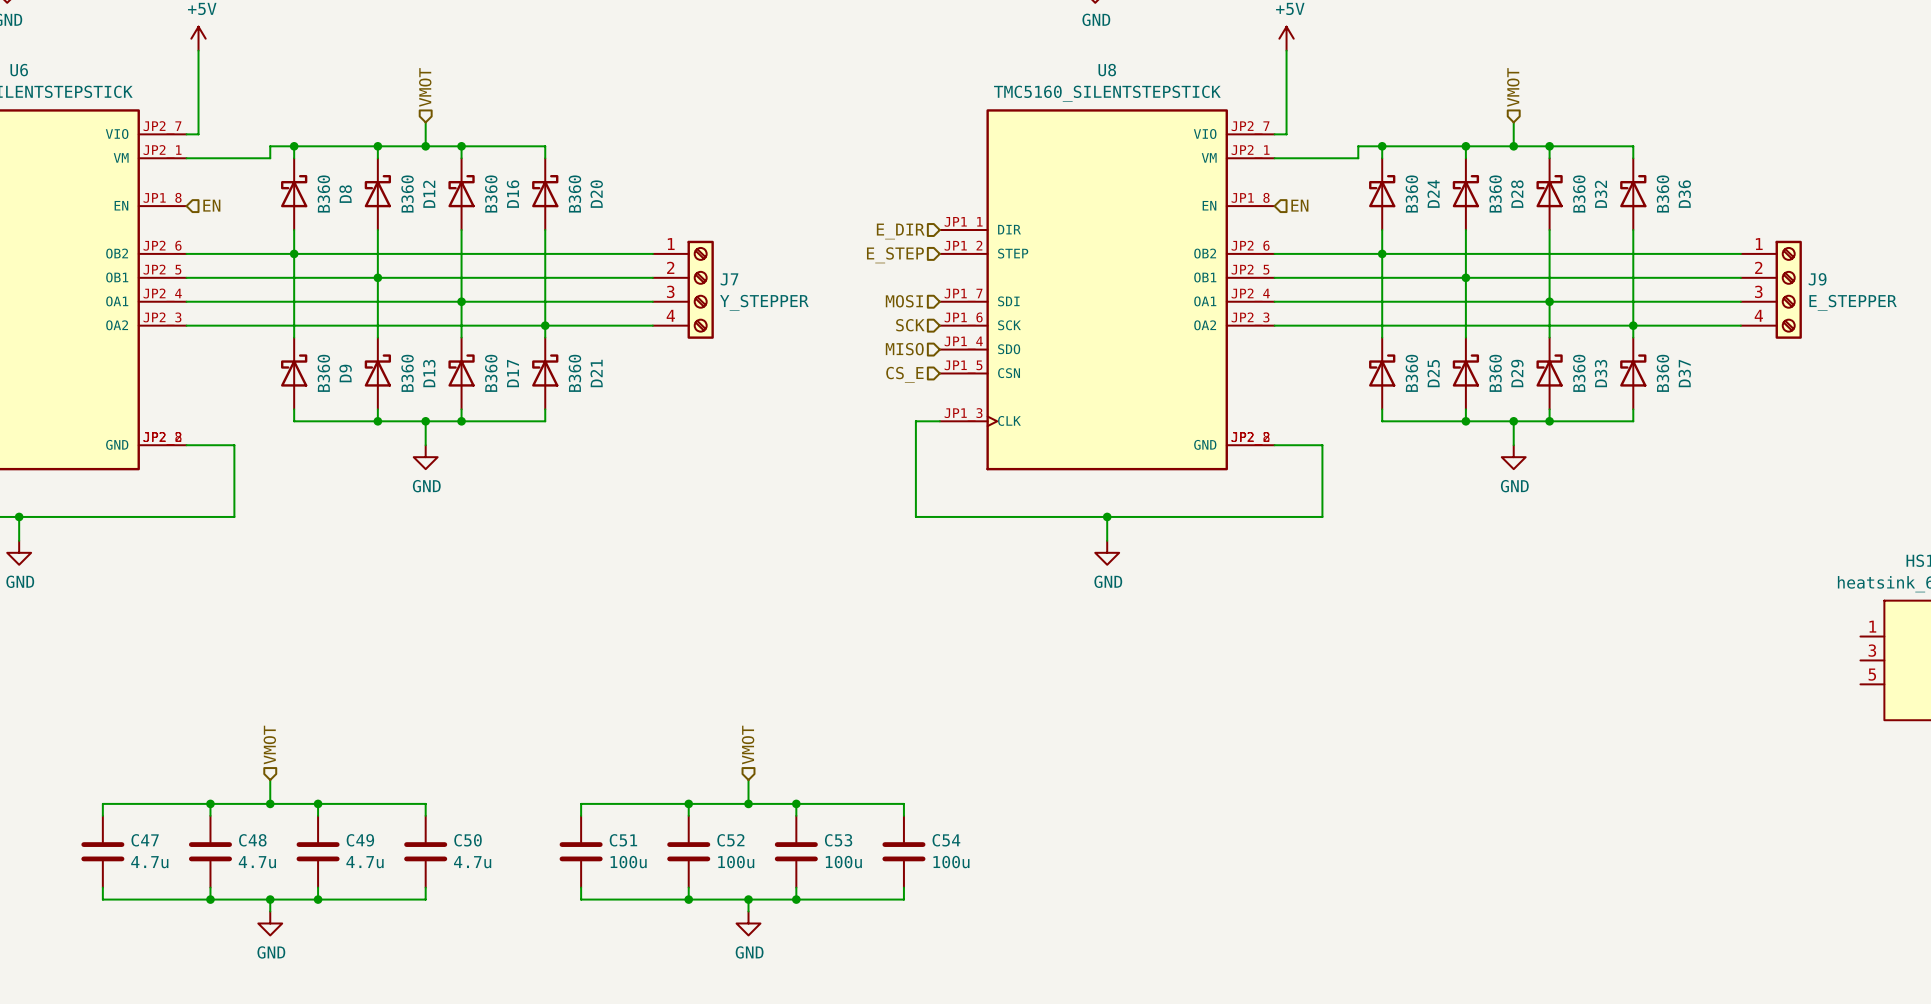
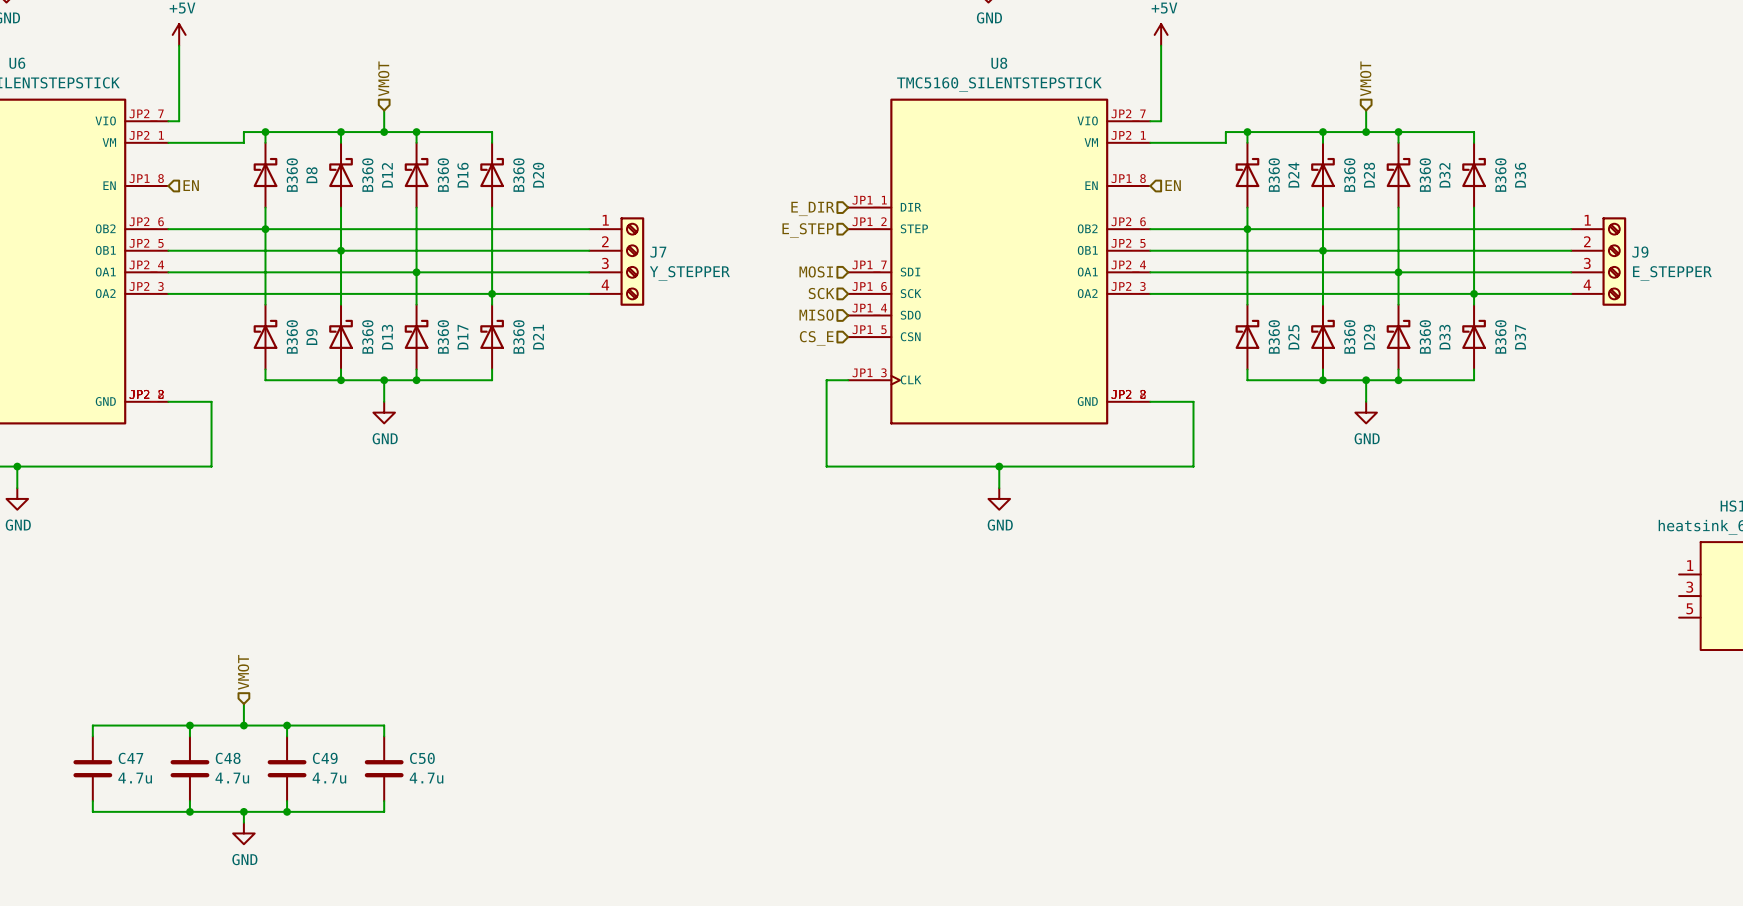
hierarchical label: VMOT (748, 745) -> none
wire: (748, 780) (748, 803) -> none
wire: (688, 803) (688, 815) -> none
junction: (688, 803) -> none
junction: (748, 803) -> none
wire: (796, 803) (796, 815) -> none
junction: (796, 803) -> none
wire: (581, 815) (581, 803) (903, 803) (903, 815) -> none
C51: 100u (581, 851) -> none
C52: 100u (688, 851) -> none
C53: 100u (796, 851) -> none
C54: 100u (903, 851) -> none
wire: (581, 887) (581, 899) (903, 899) (903, 887) -> none
wire: (688, 887) (688, 899) -> none
wire: (796, 887) (796, 899) -> none
junction: (688, 899) -> none
wire: (748, 899) (748, 911) -> none
junction: (748, 899) -> none
junction: (796, 899) -> none
power symbol: GND (748, 923) -> none

